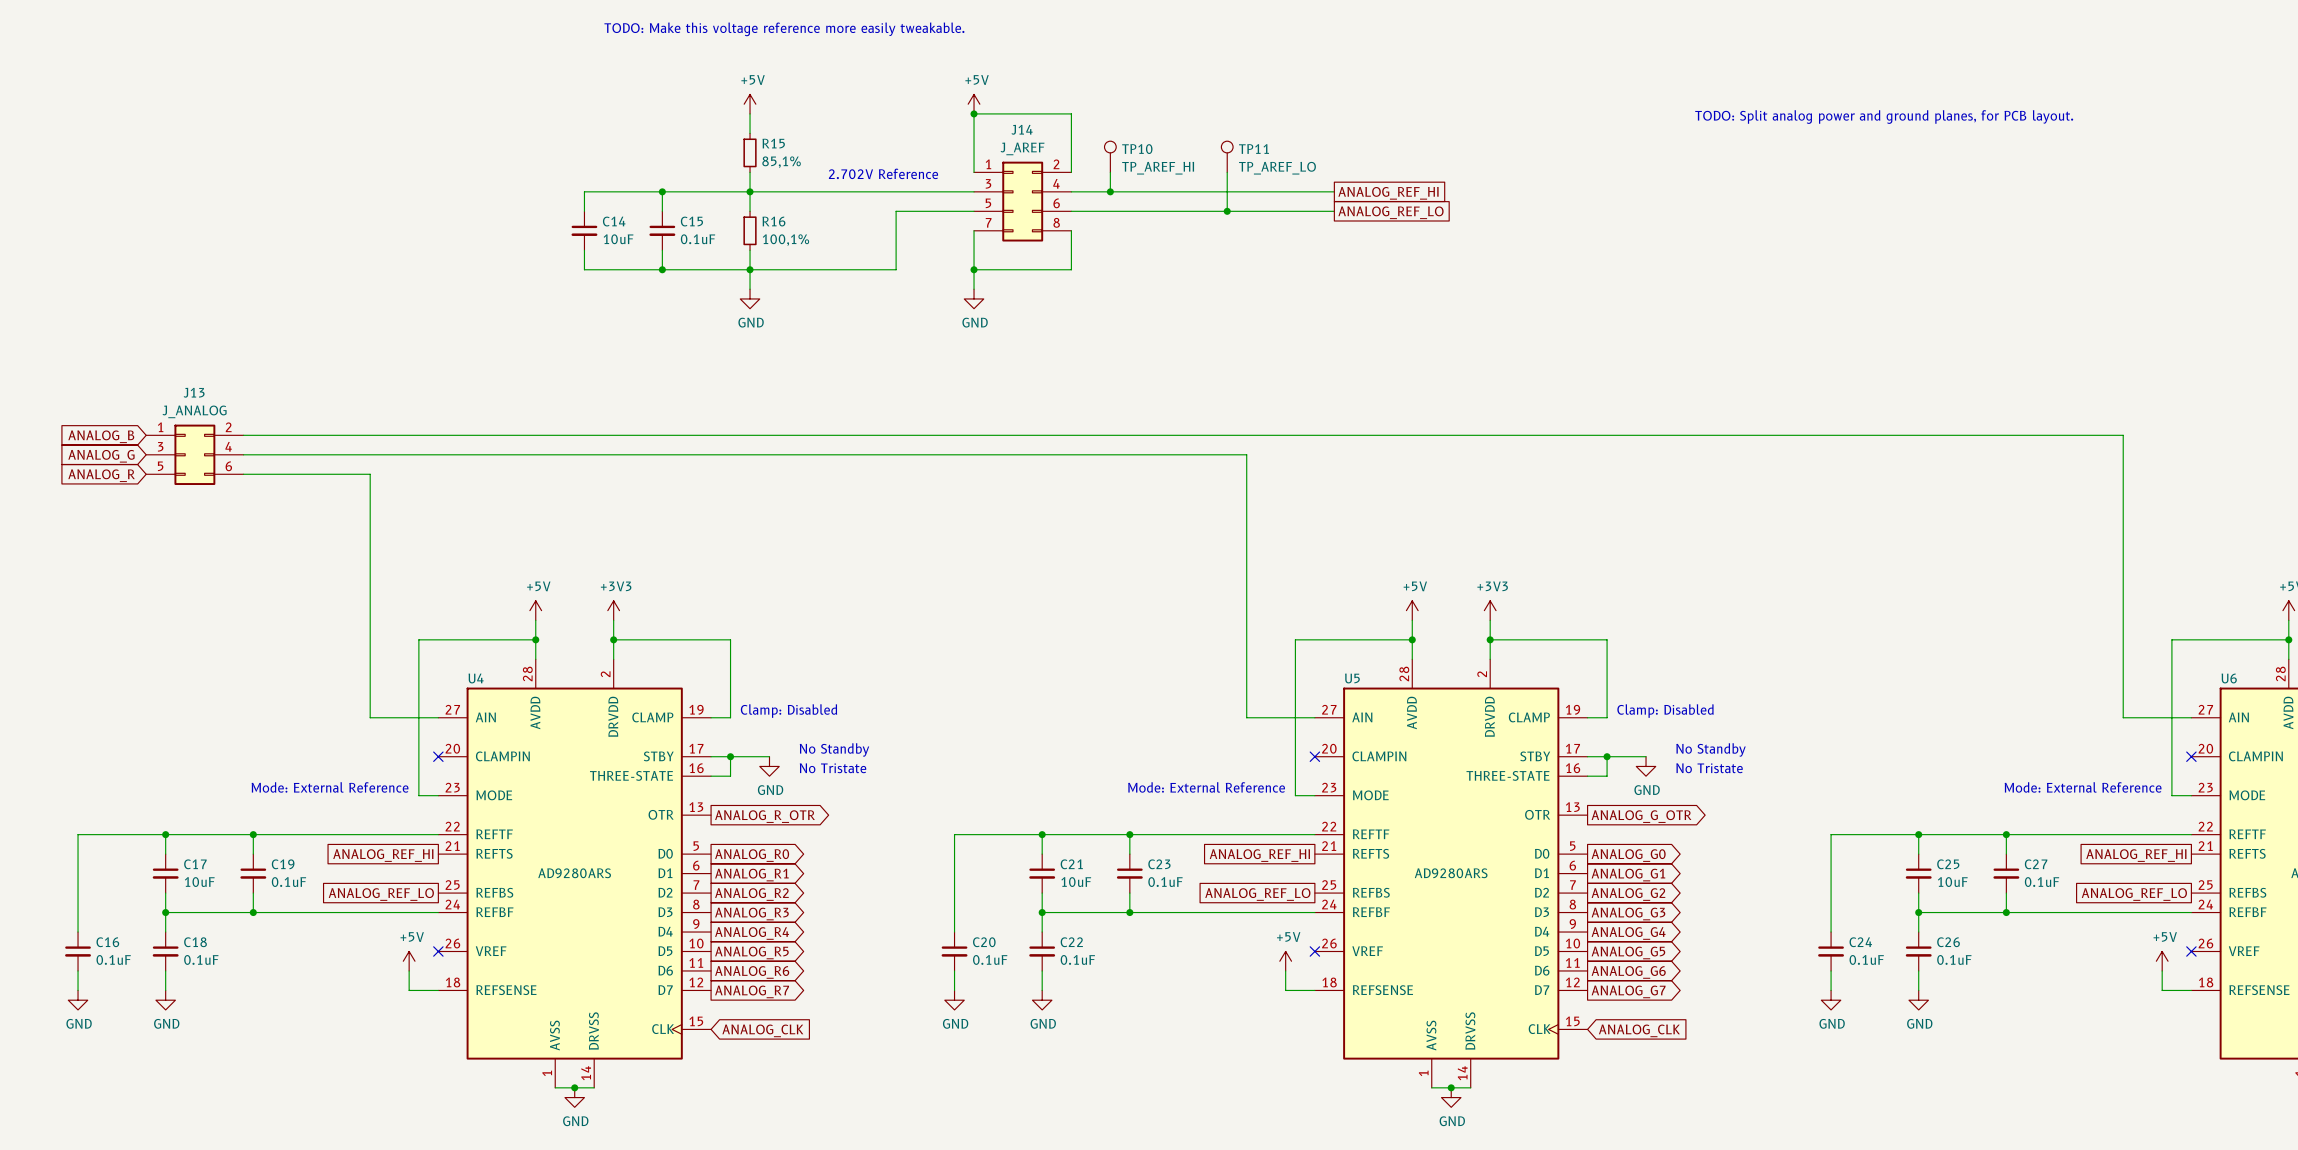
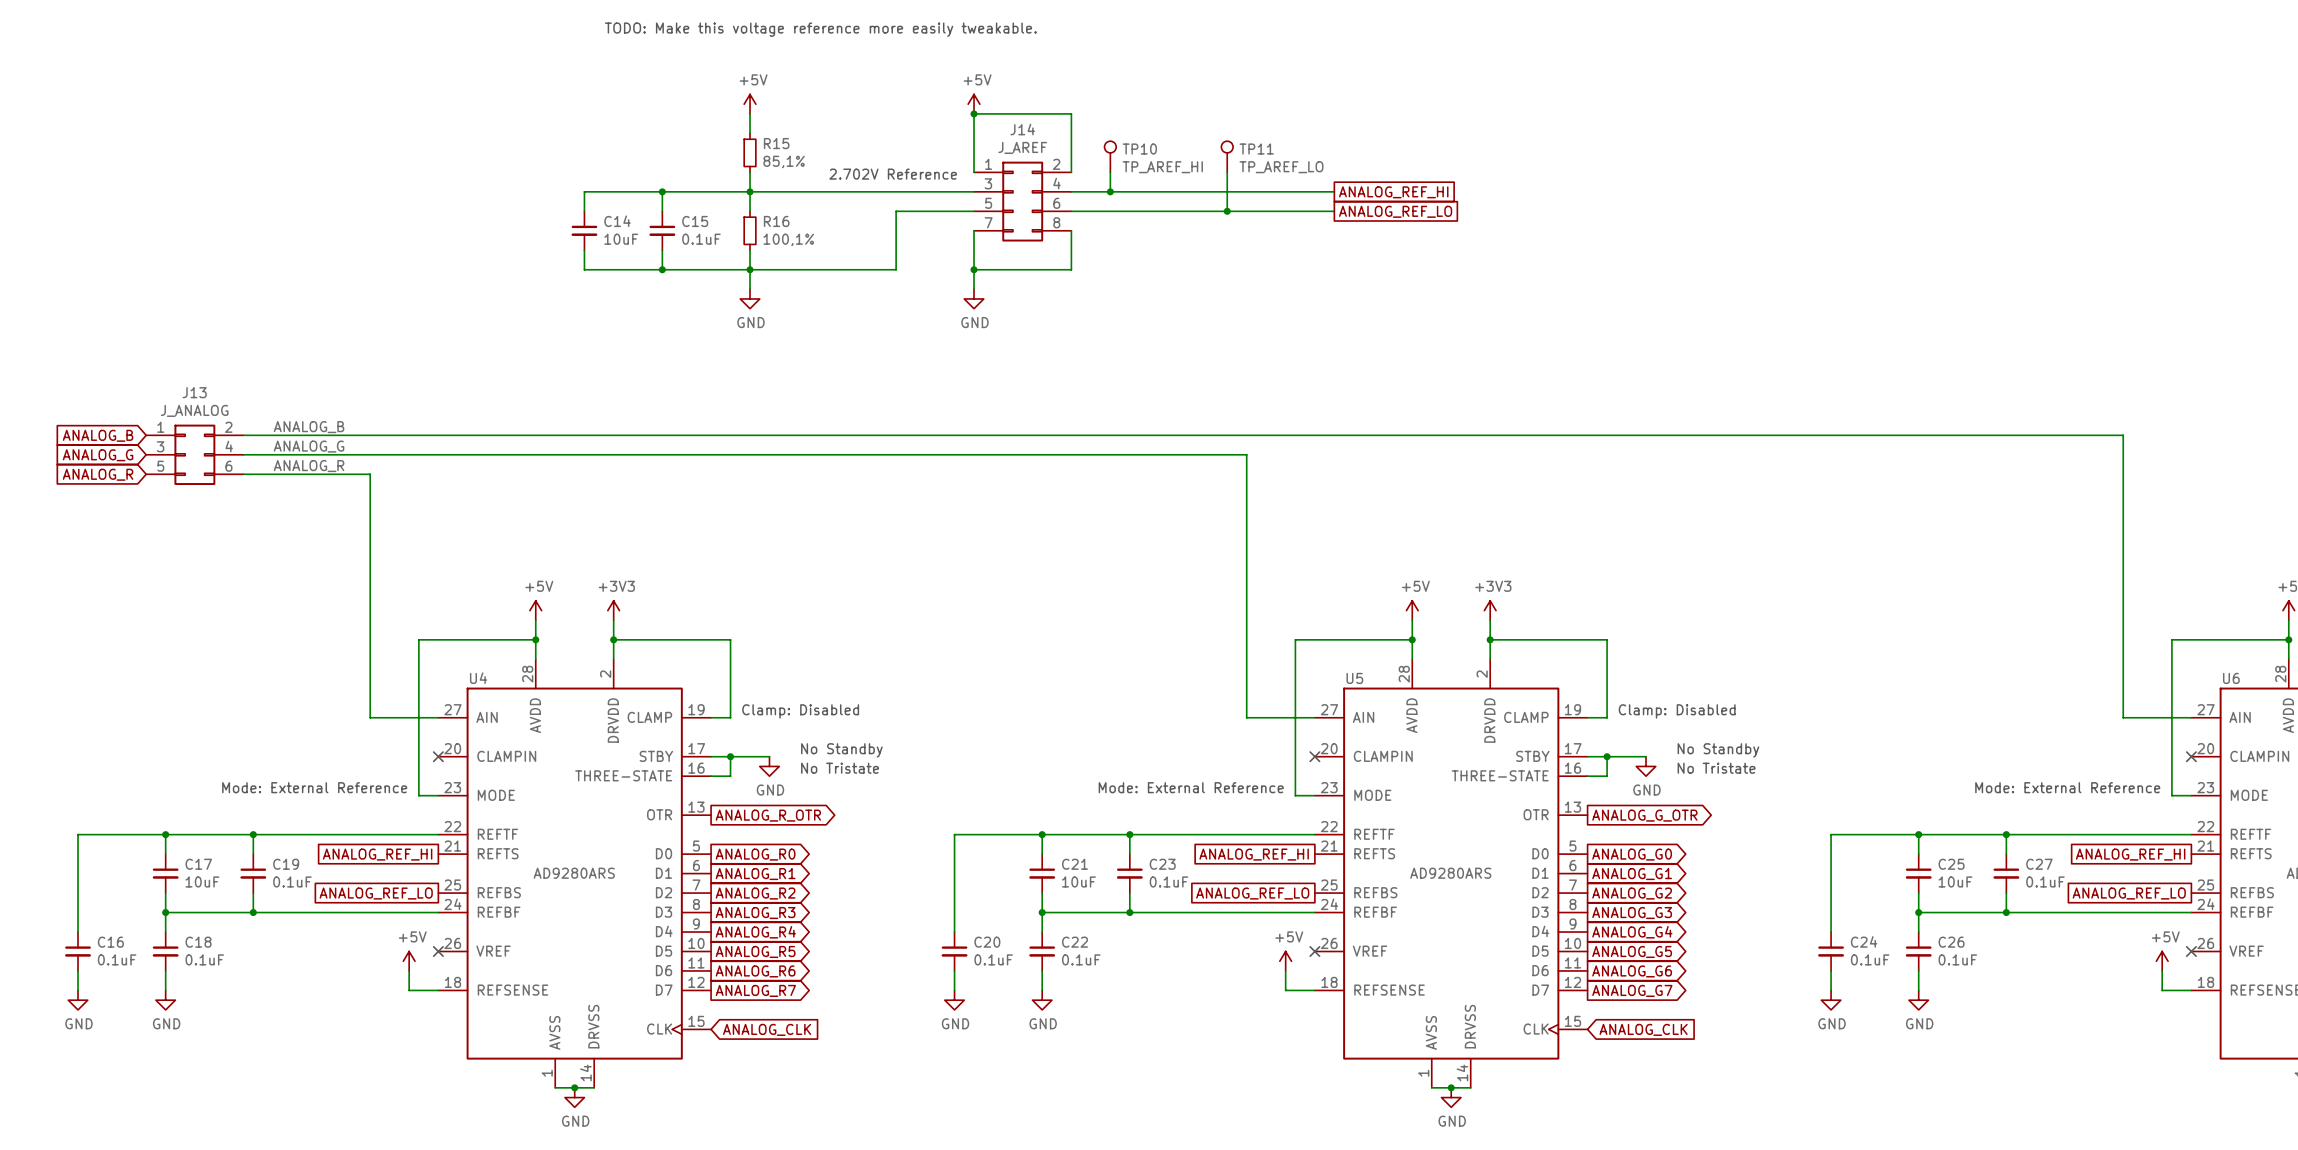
text: TODO: Split analog power and ground planes, for PCB layout. (1884, 117) -> none
label: none -> ANALOG_B (309, 427)
label: none -> ANALOG_G (309, 446)
label: none -> ANALOG_R (309, 466)

